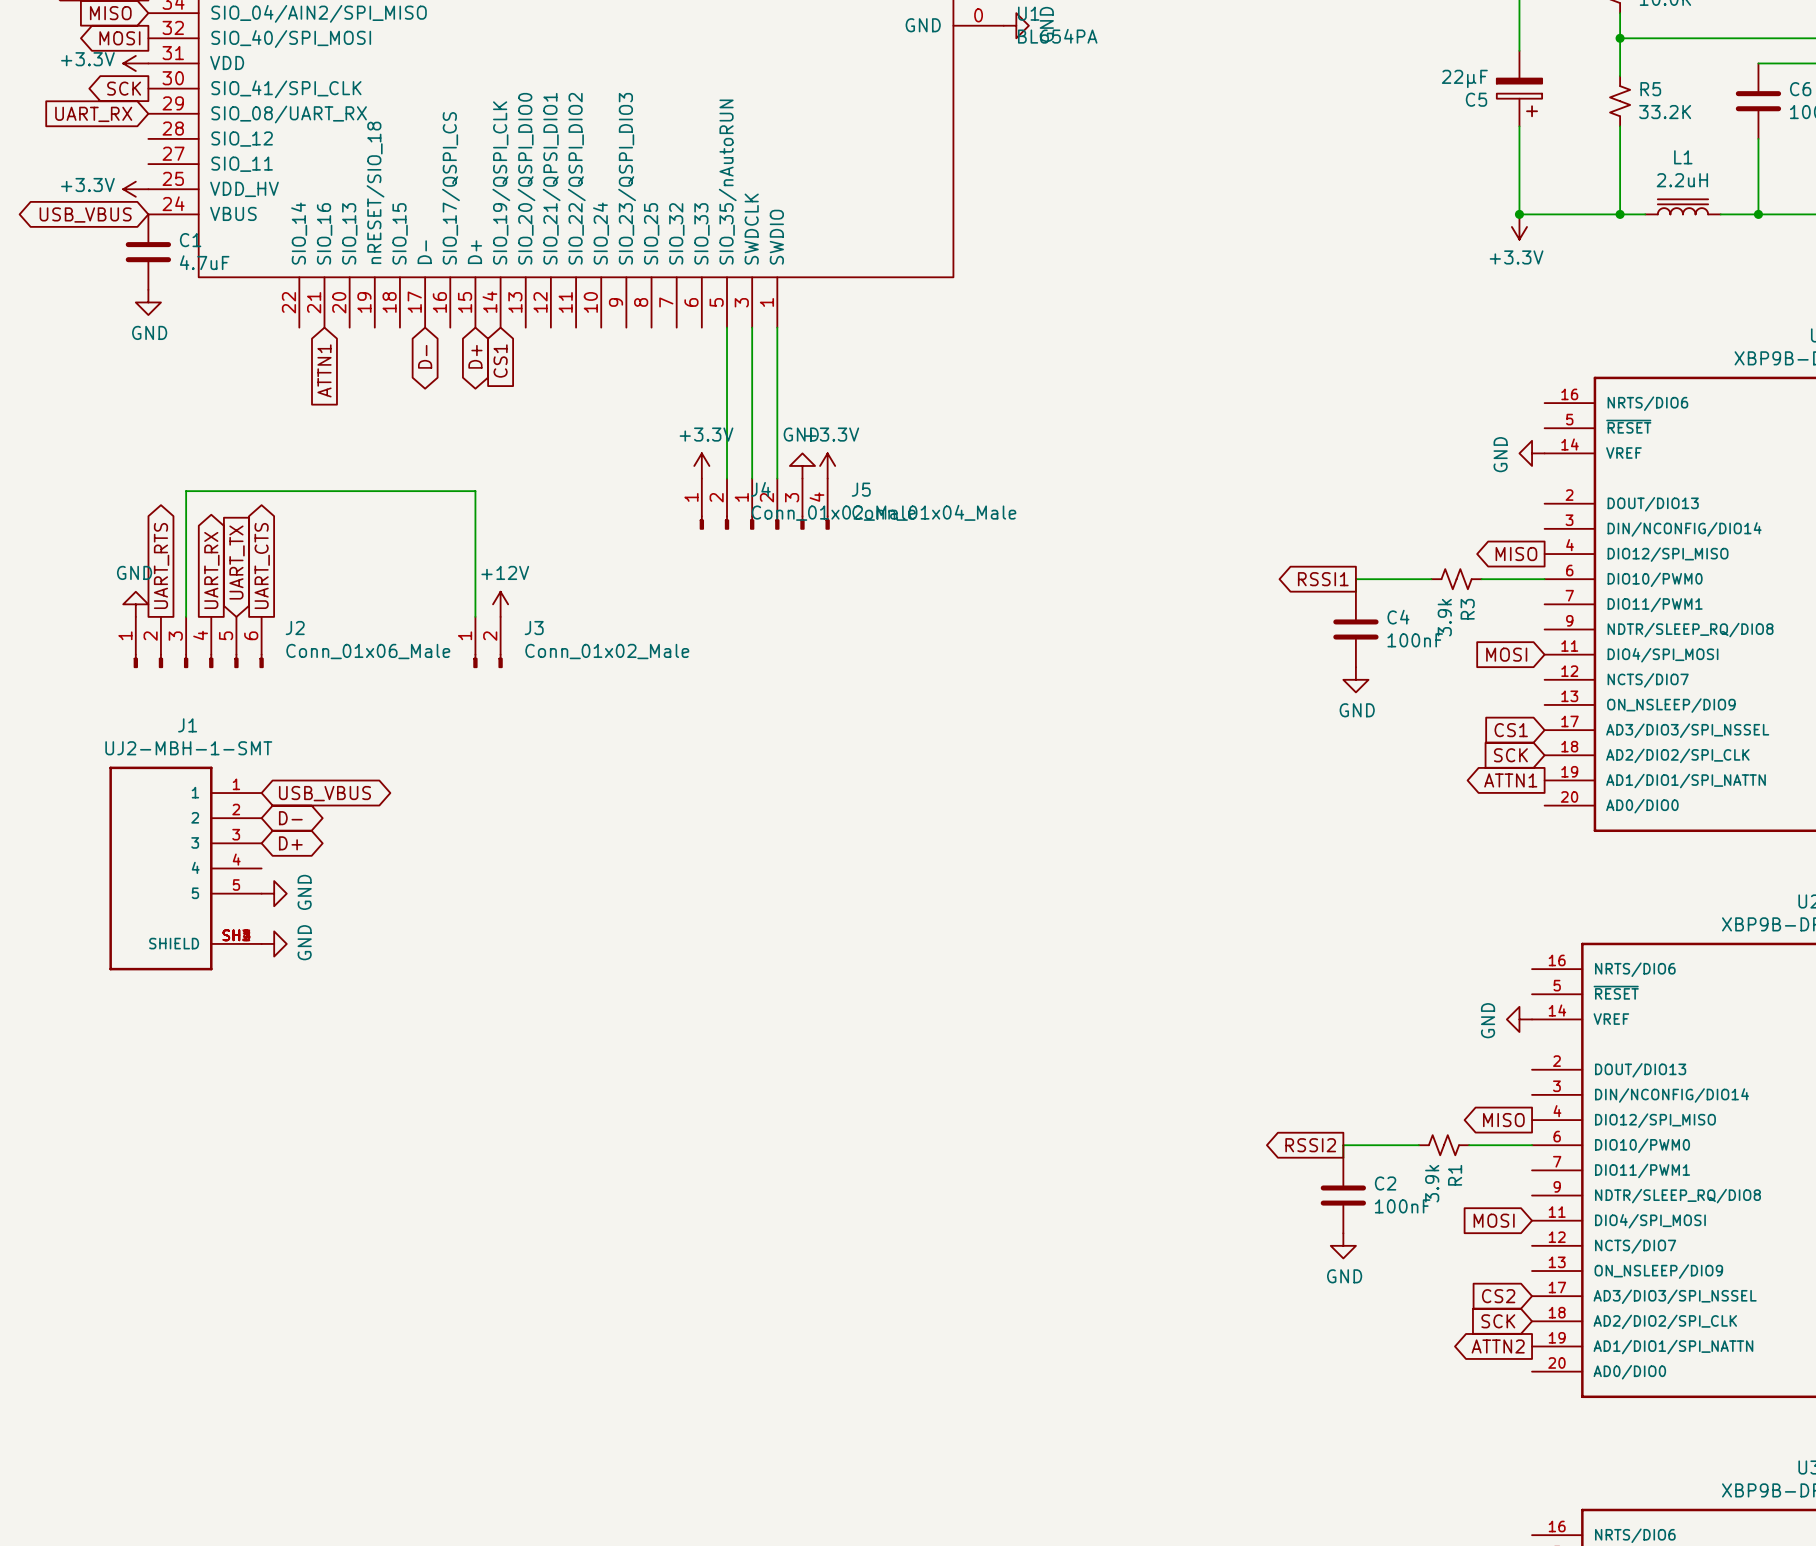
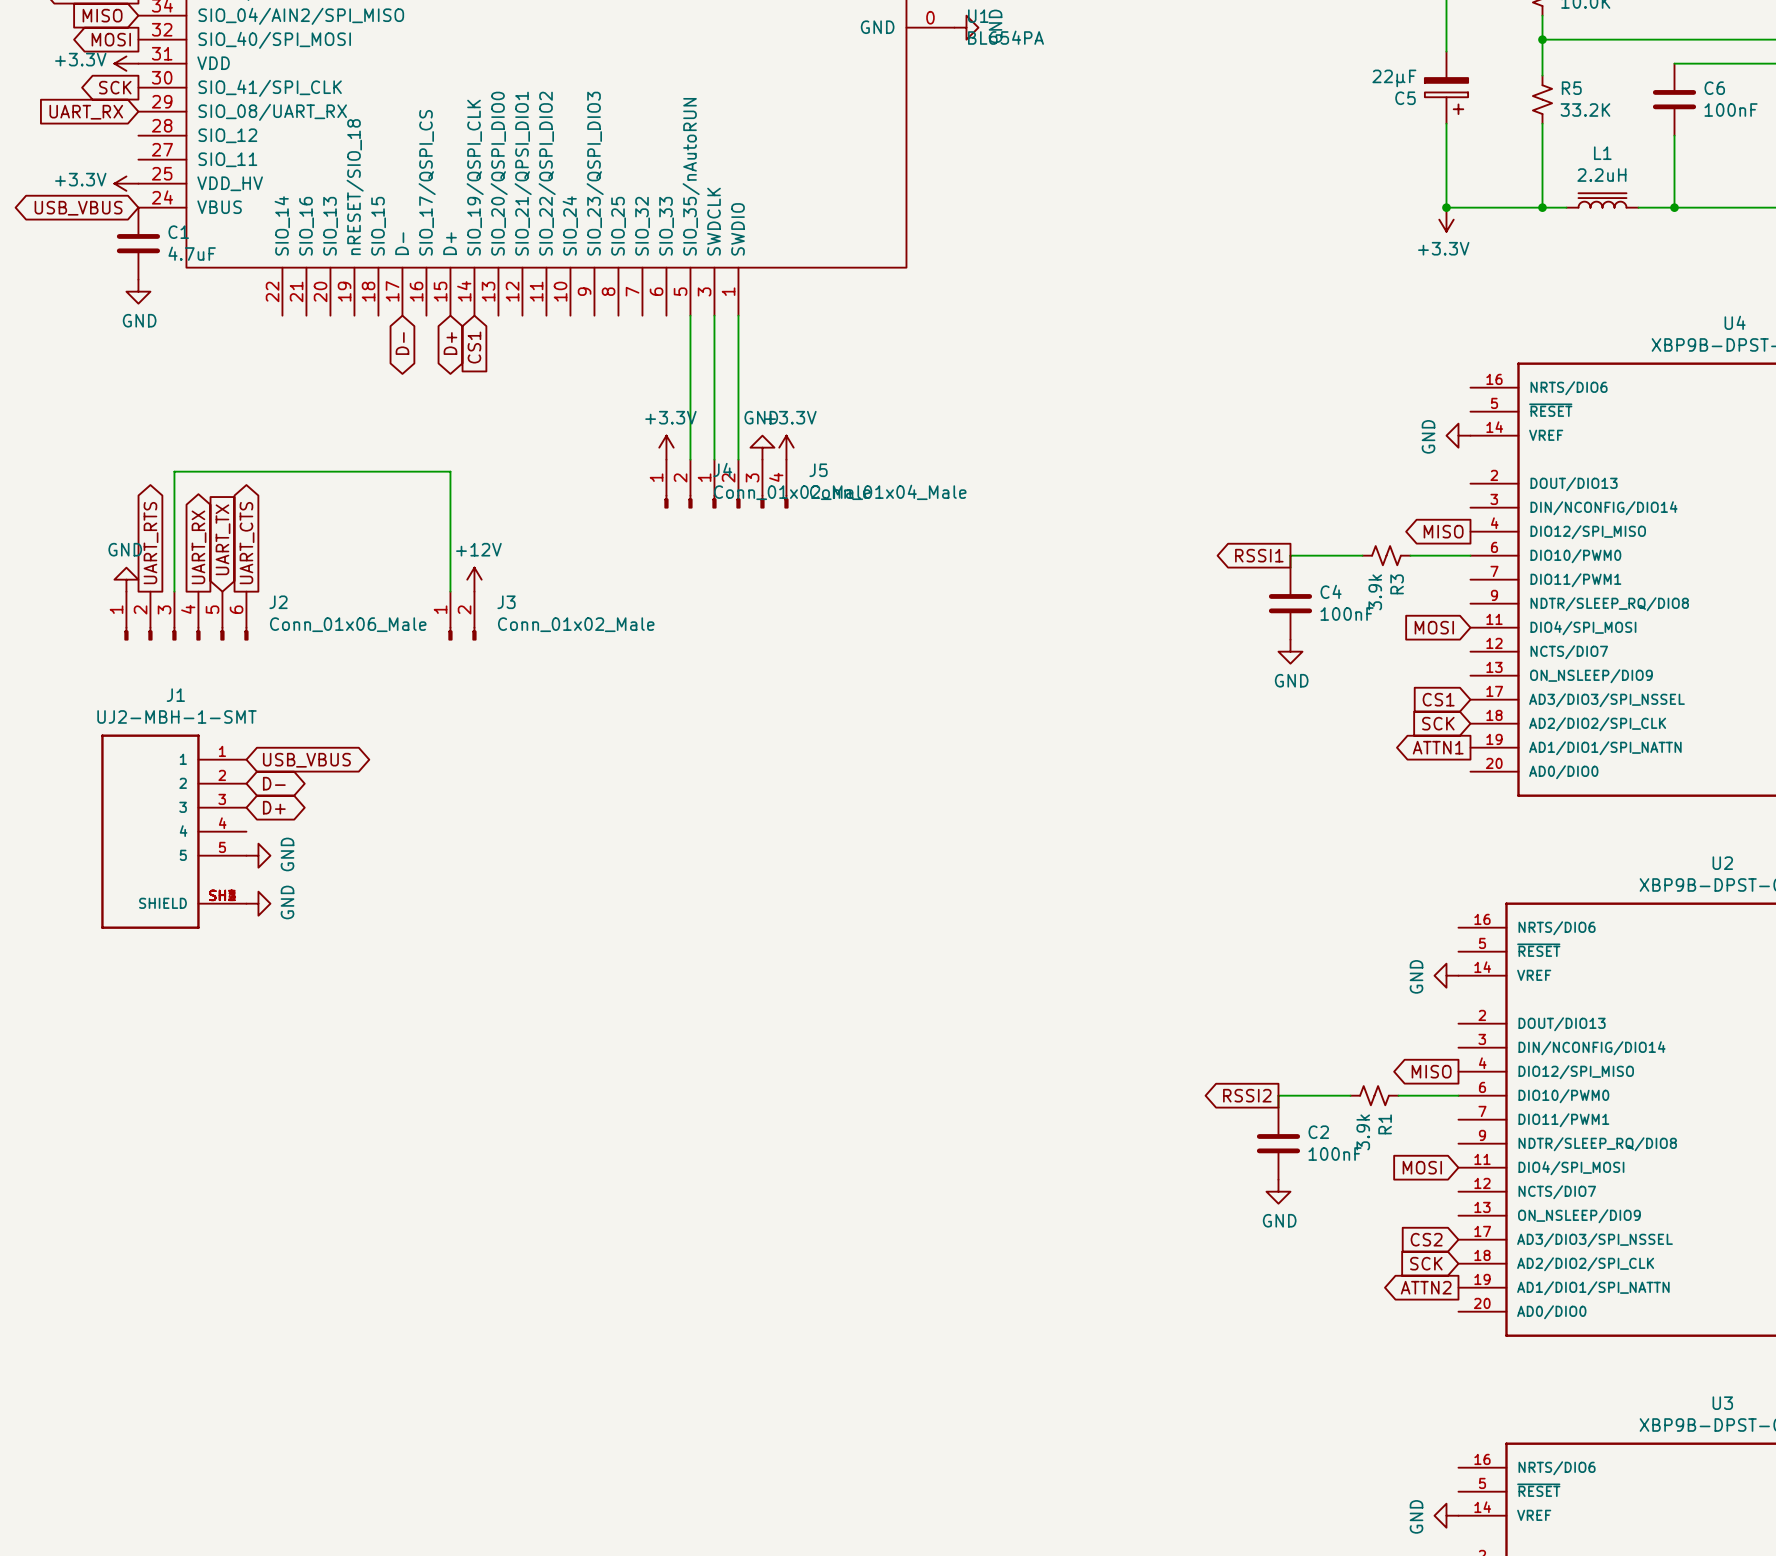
global label: ATTN1 (324, 370) -> none

